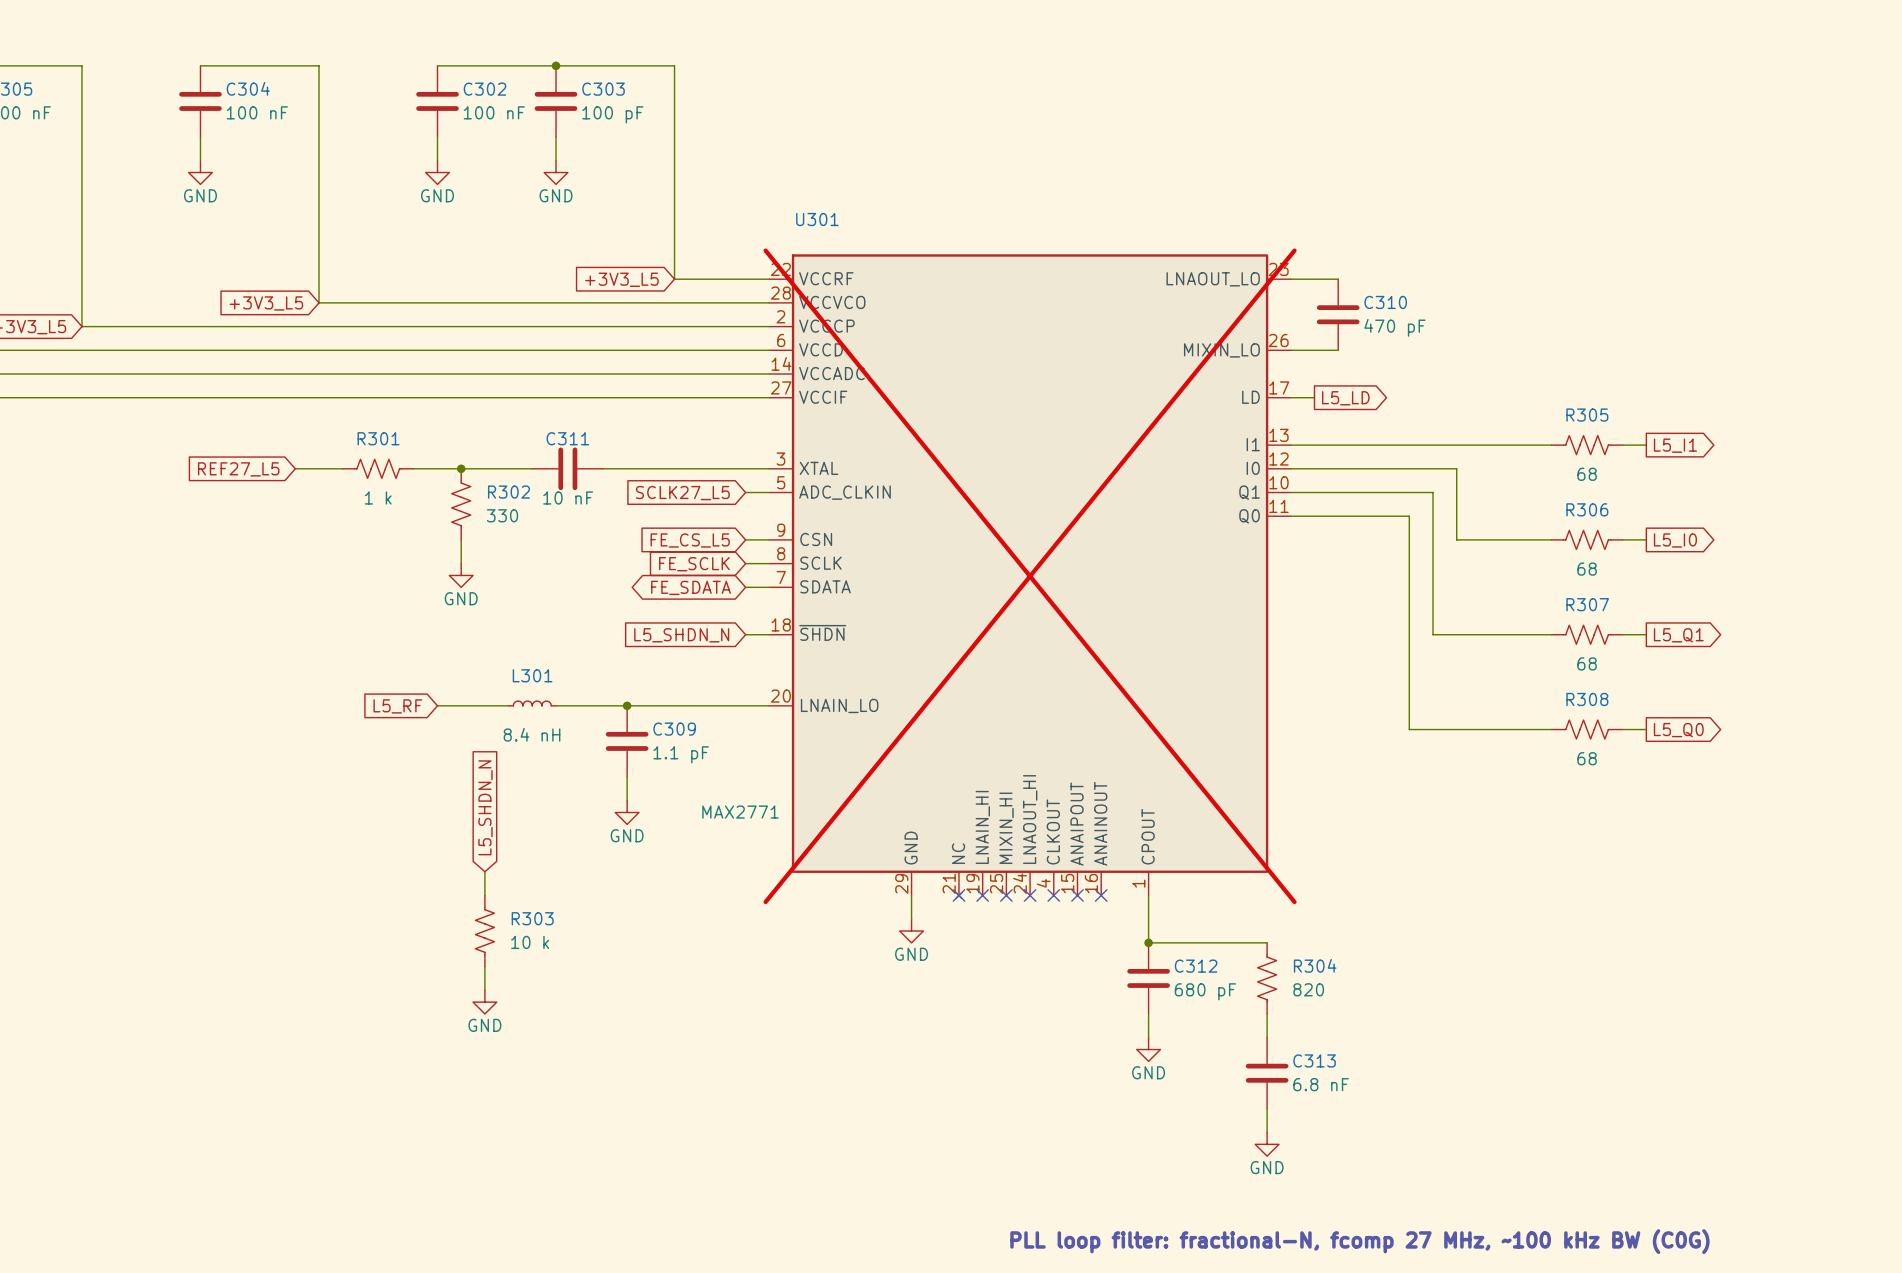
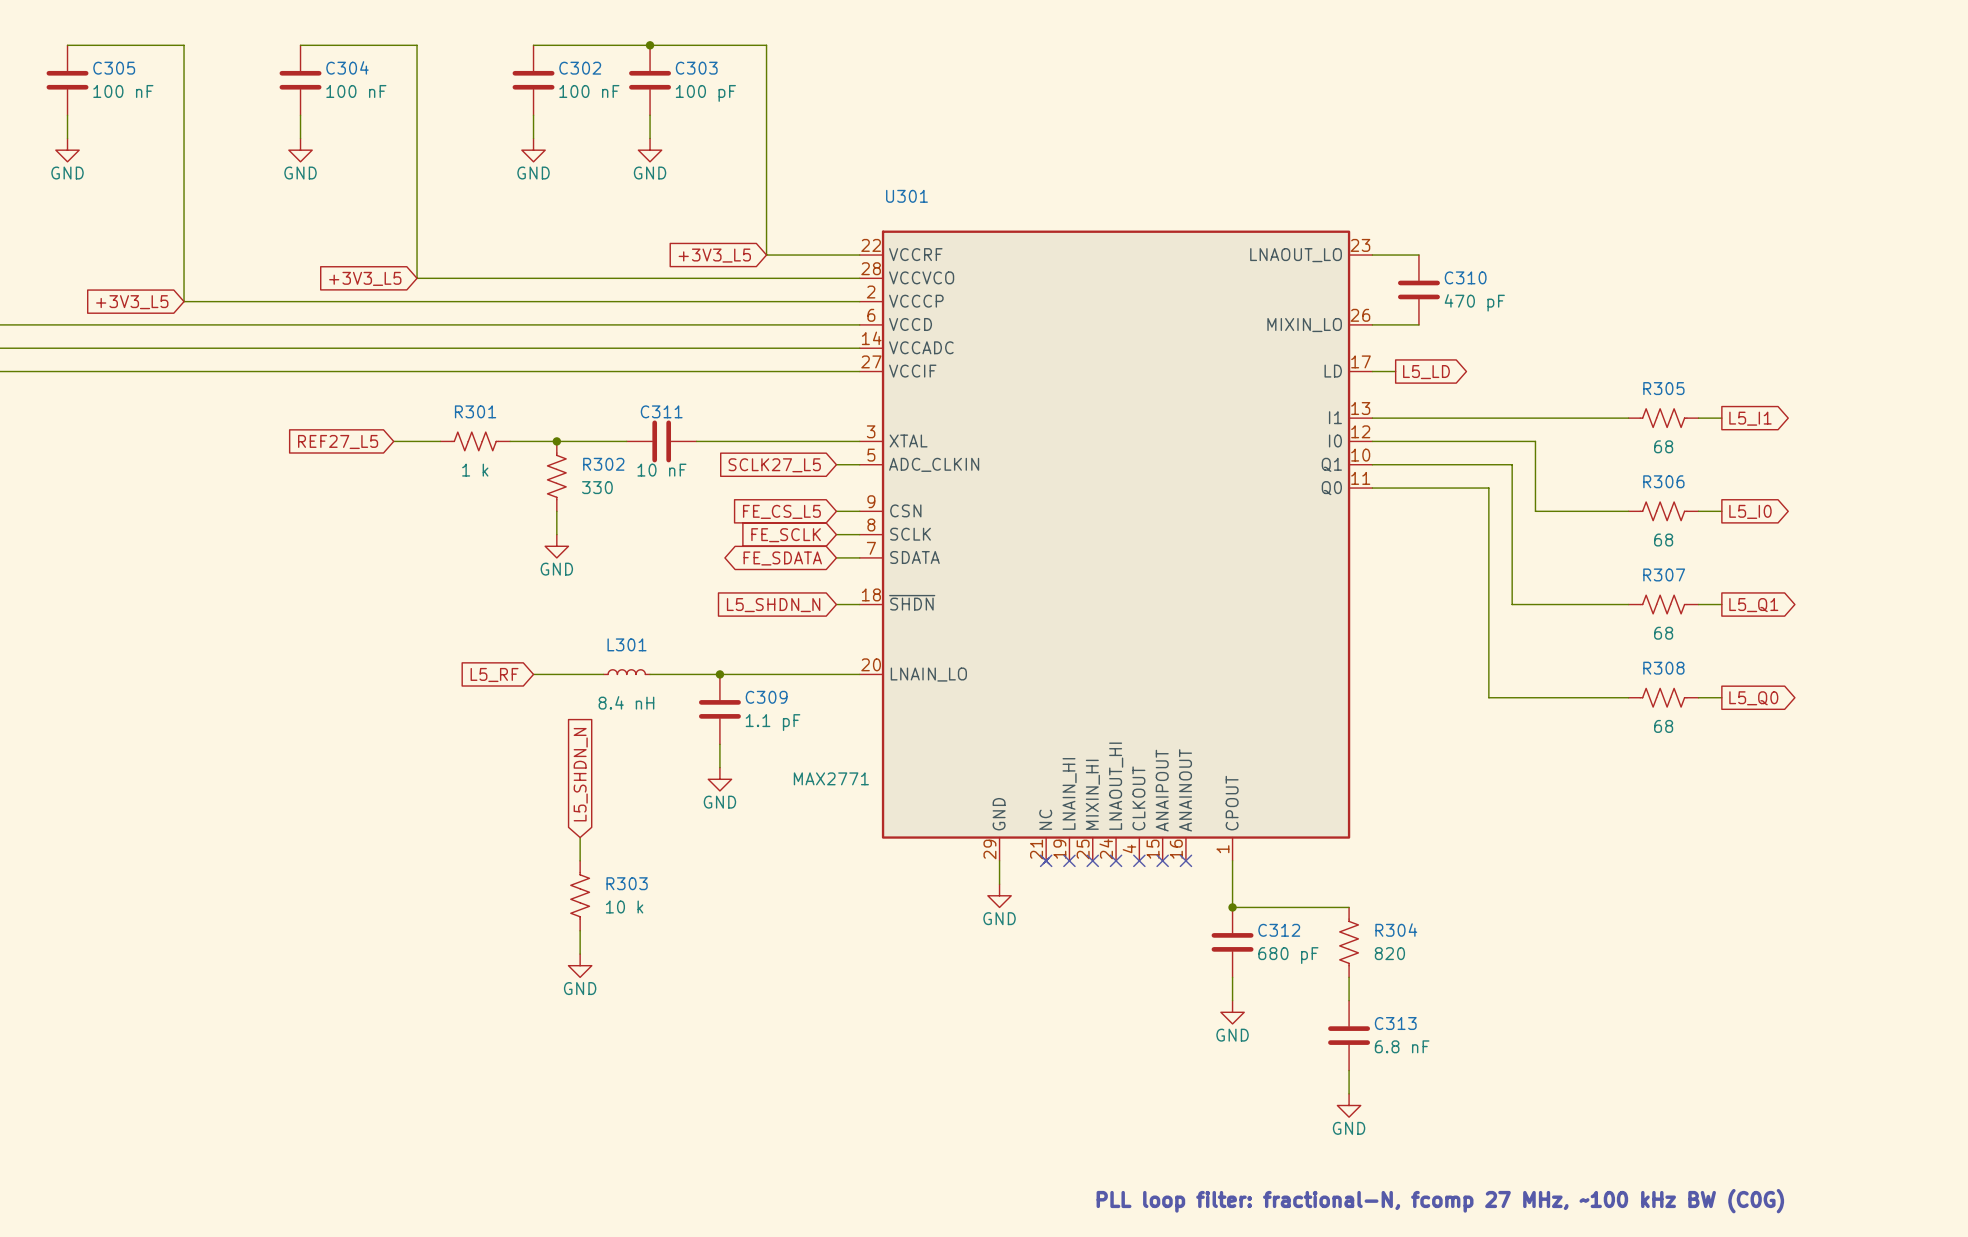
U301 do-not-place cross: (1030, 576) -> none

